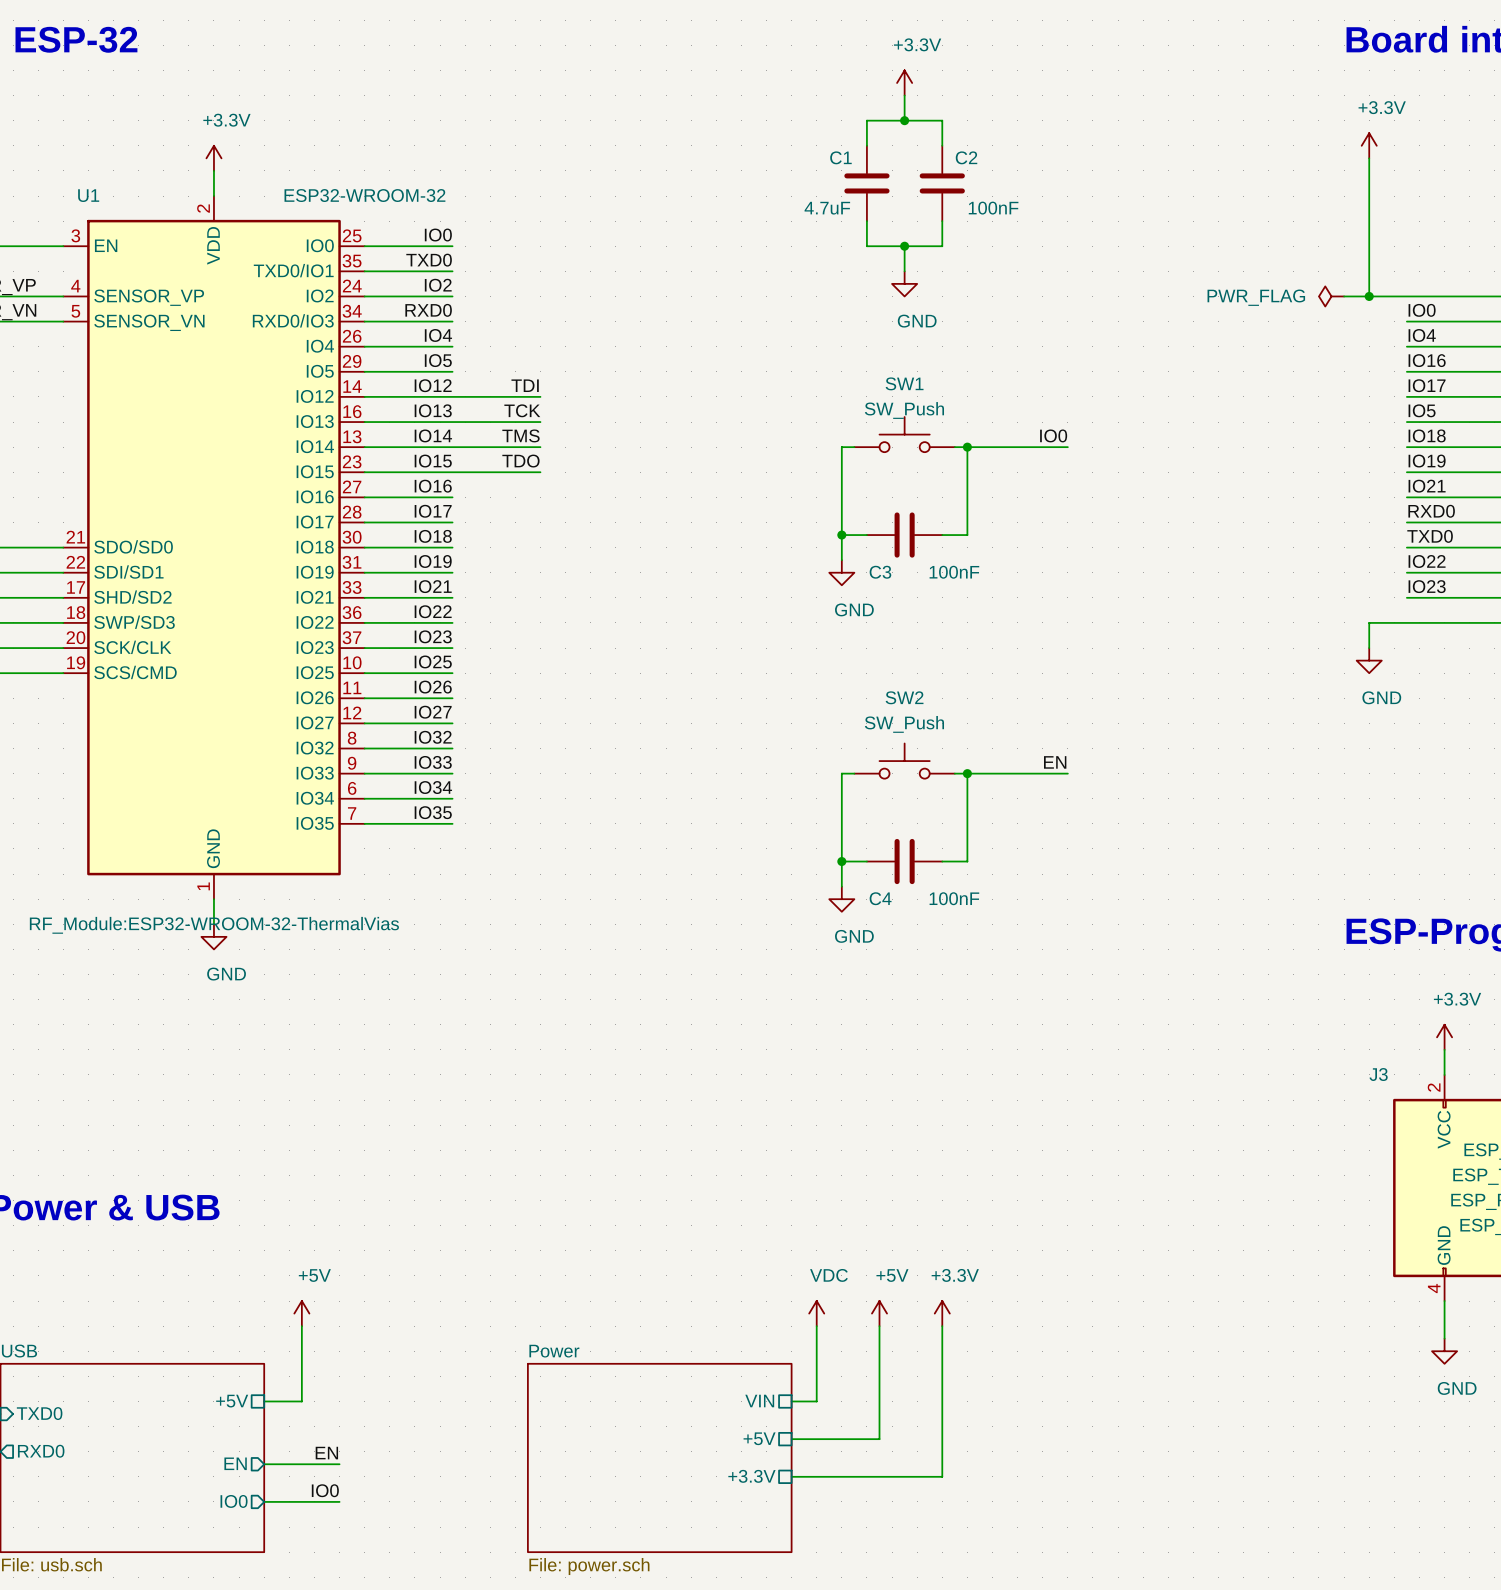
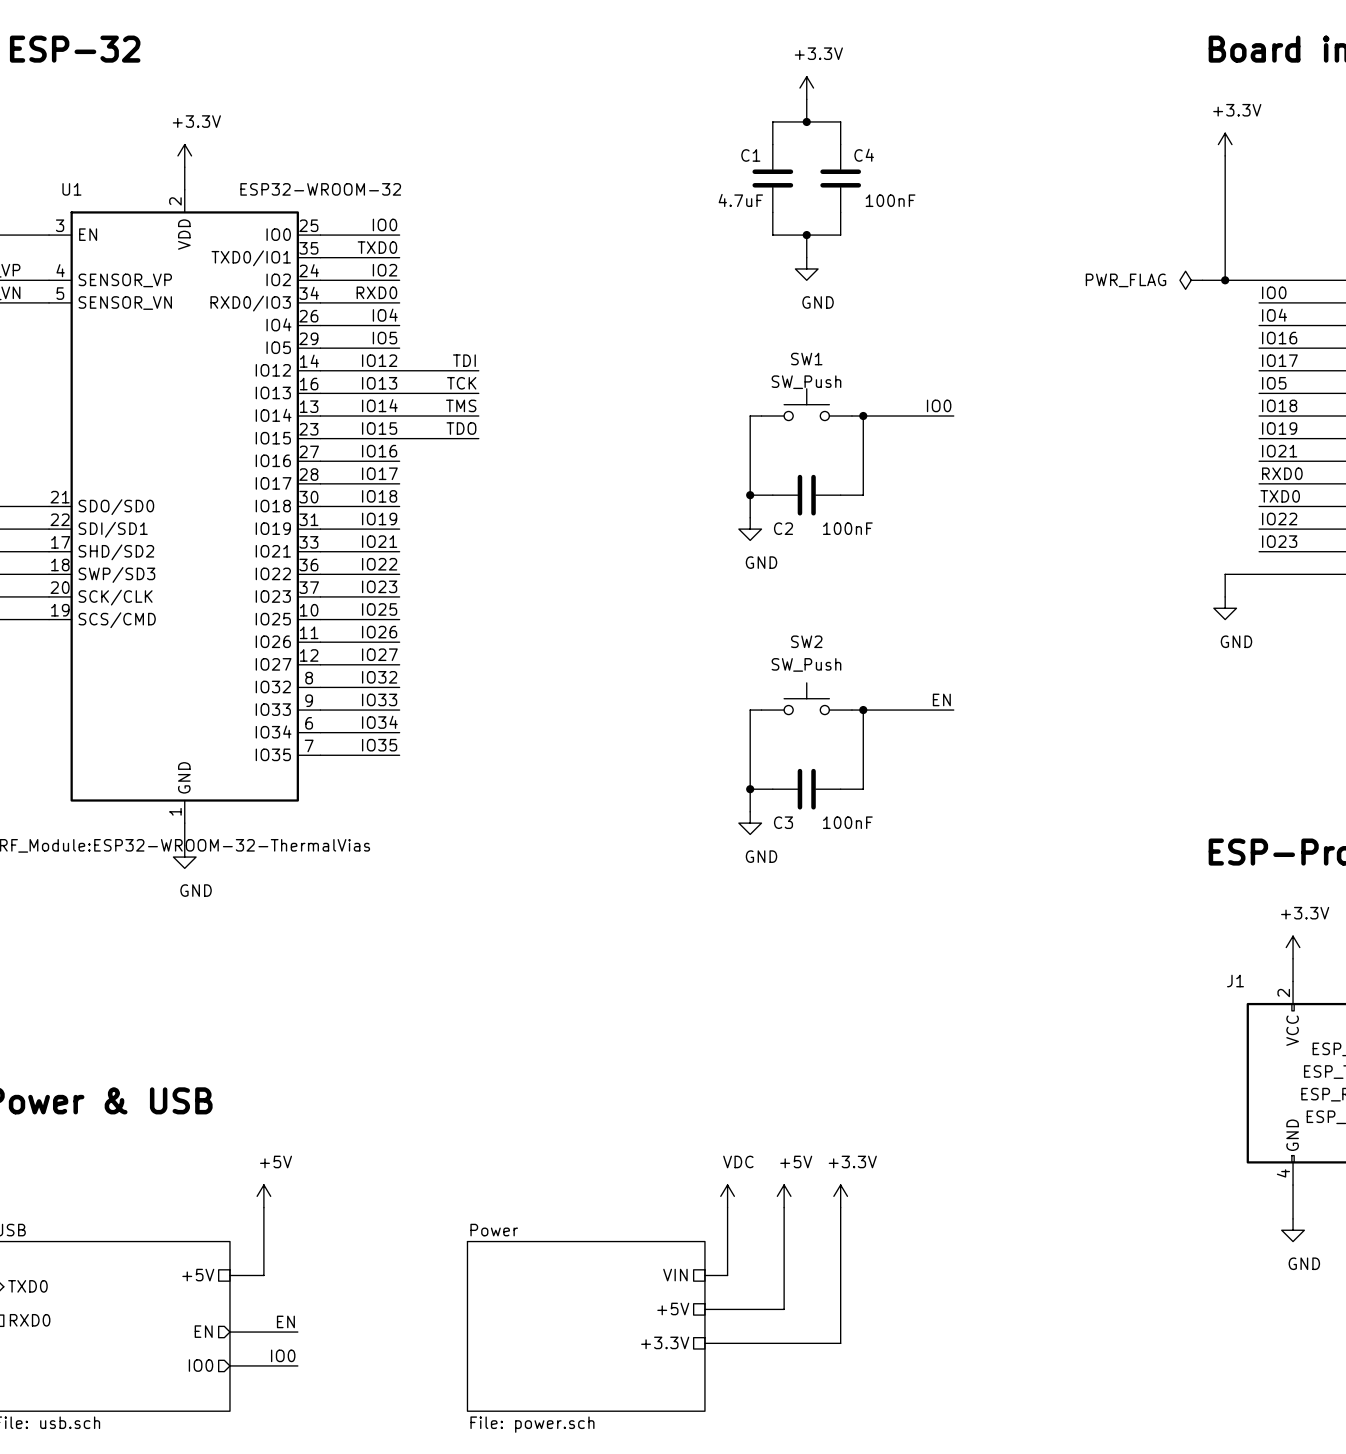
C2 name: C2 (966, 157) -> C4 (864, 155)
C3 name: C3 (880, 572) -> C2 (783, 528)
C4 name: C4 (880, 898) -> C3 (783, 822)
J3 name: J3 (1378, 1074) -> J1 (1235, 981)

